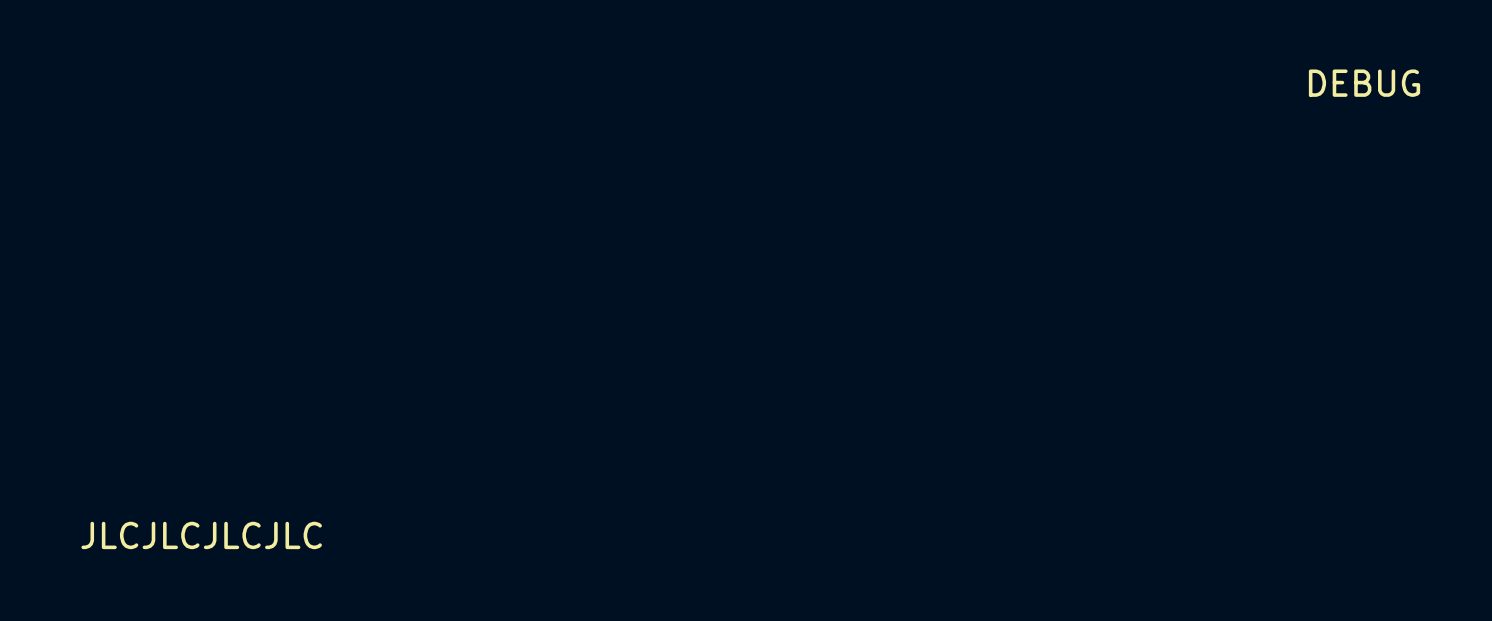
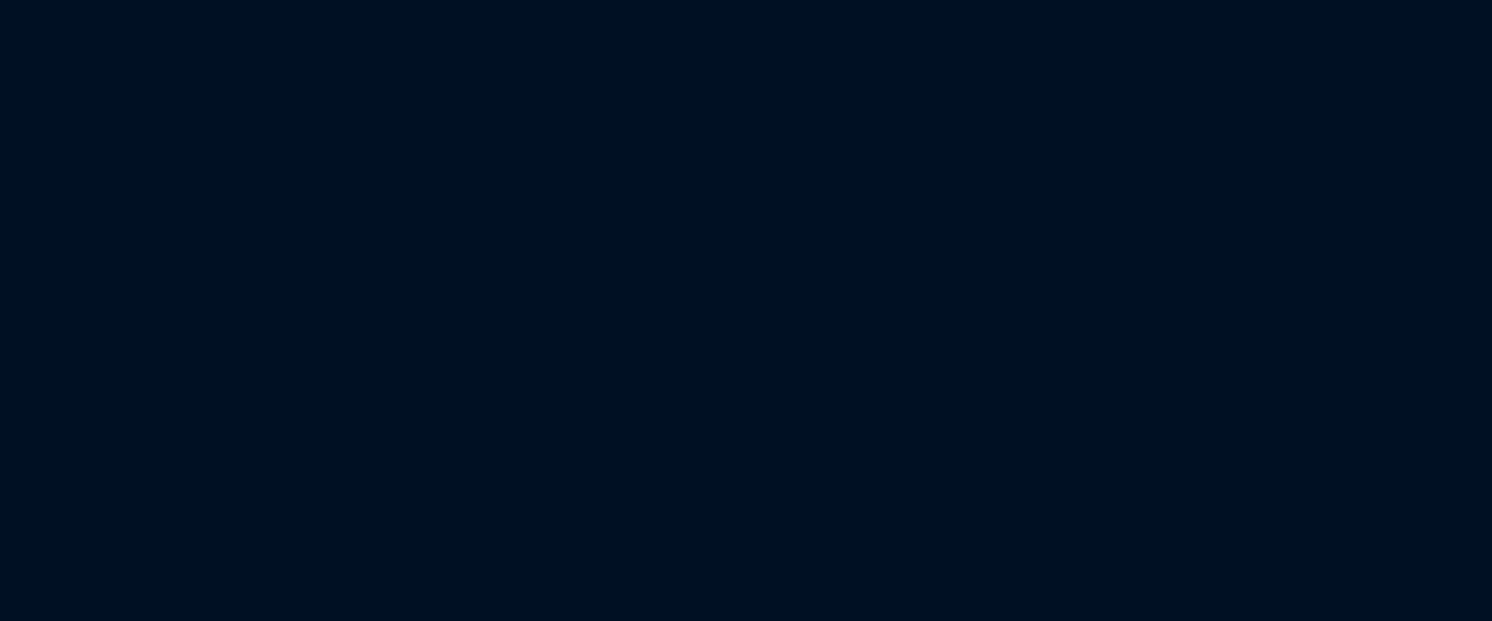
text: DEBUG (1364, 83) -> none
text: JLCJLCJLCJLC (201, 535) -> none

